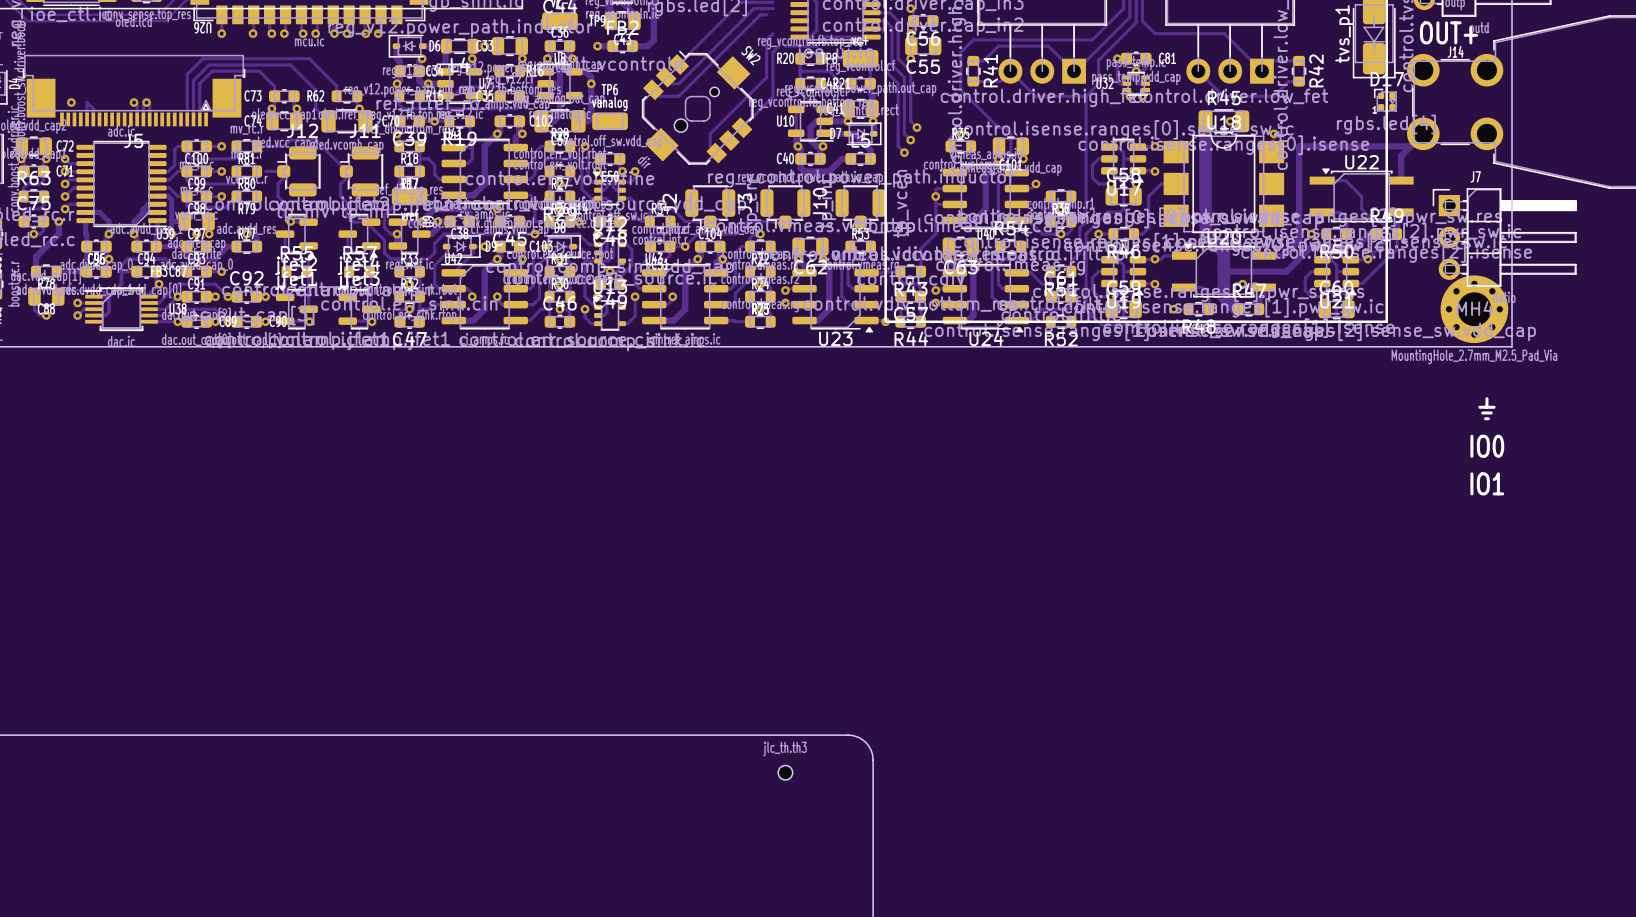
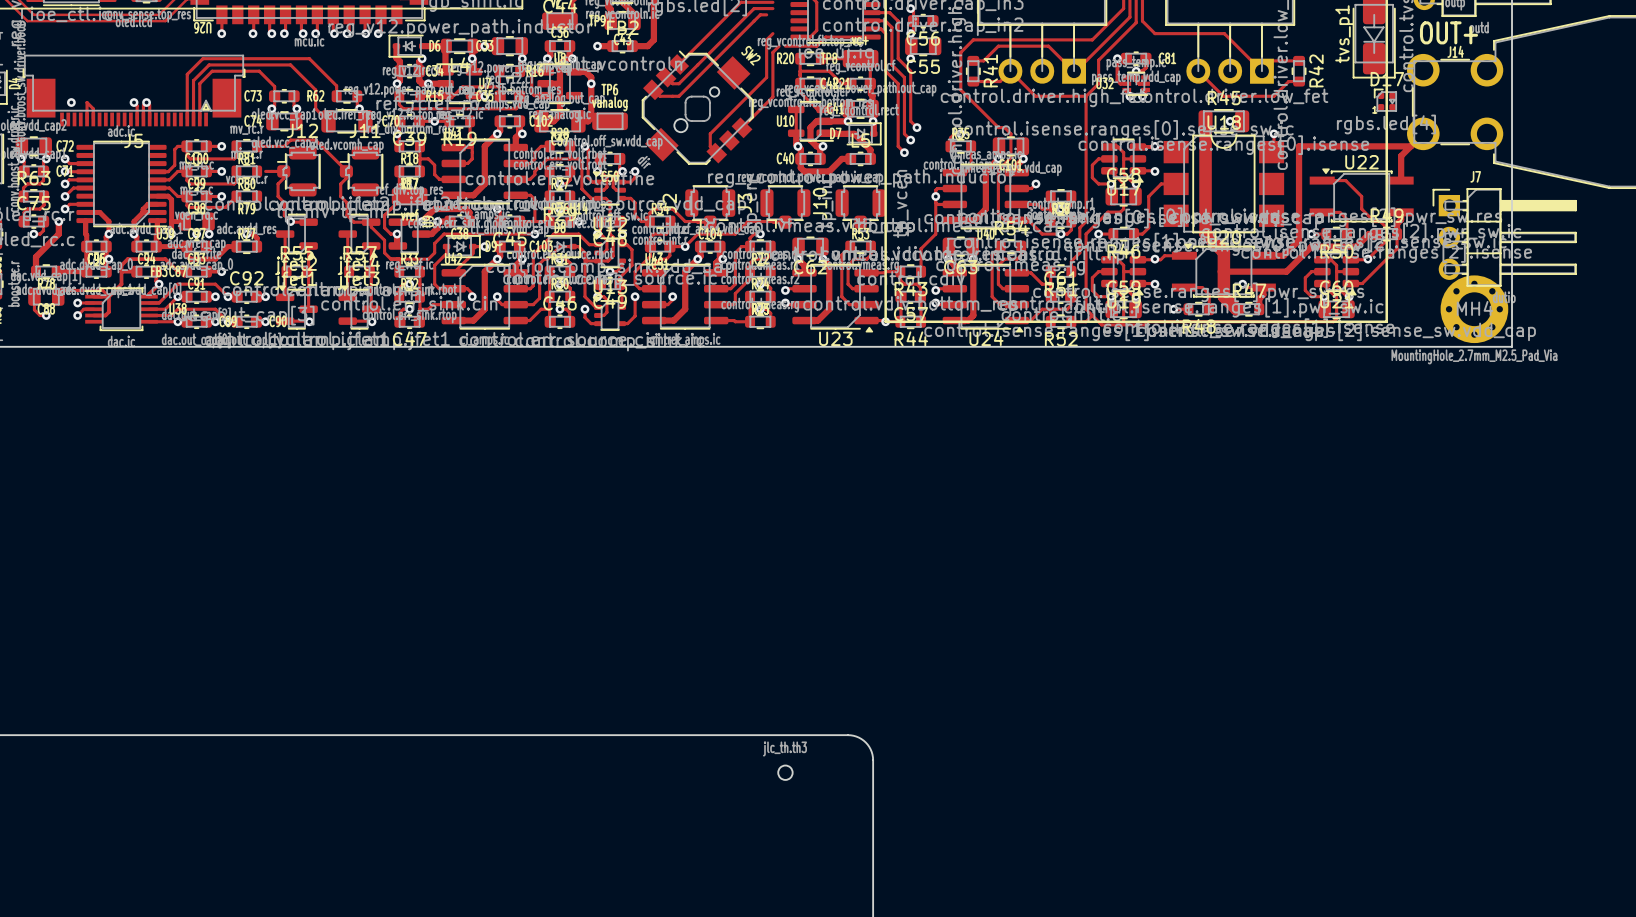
text: ⏚ (1486, 408) -> none
text: IO0 (1487, 446) -> none
text: IO1 (1487, 483) -> none

